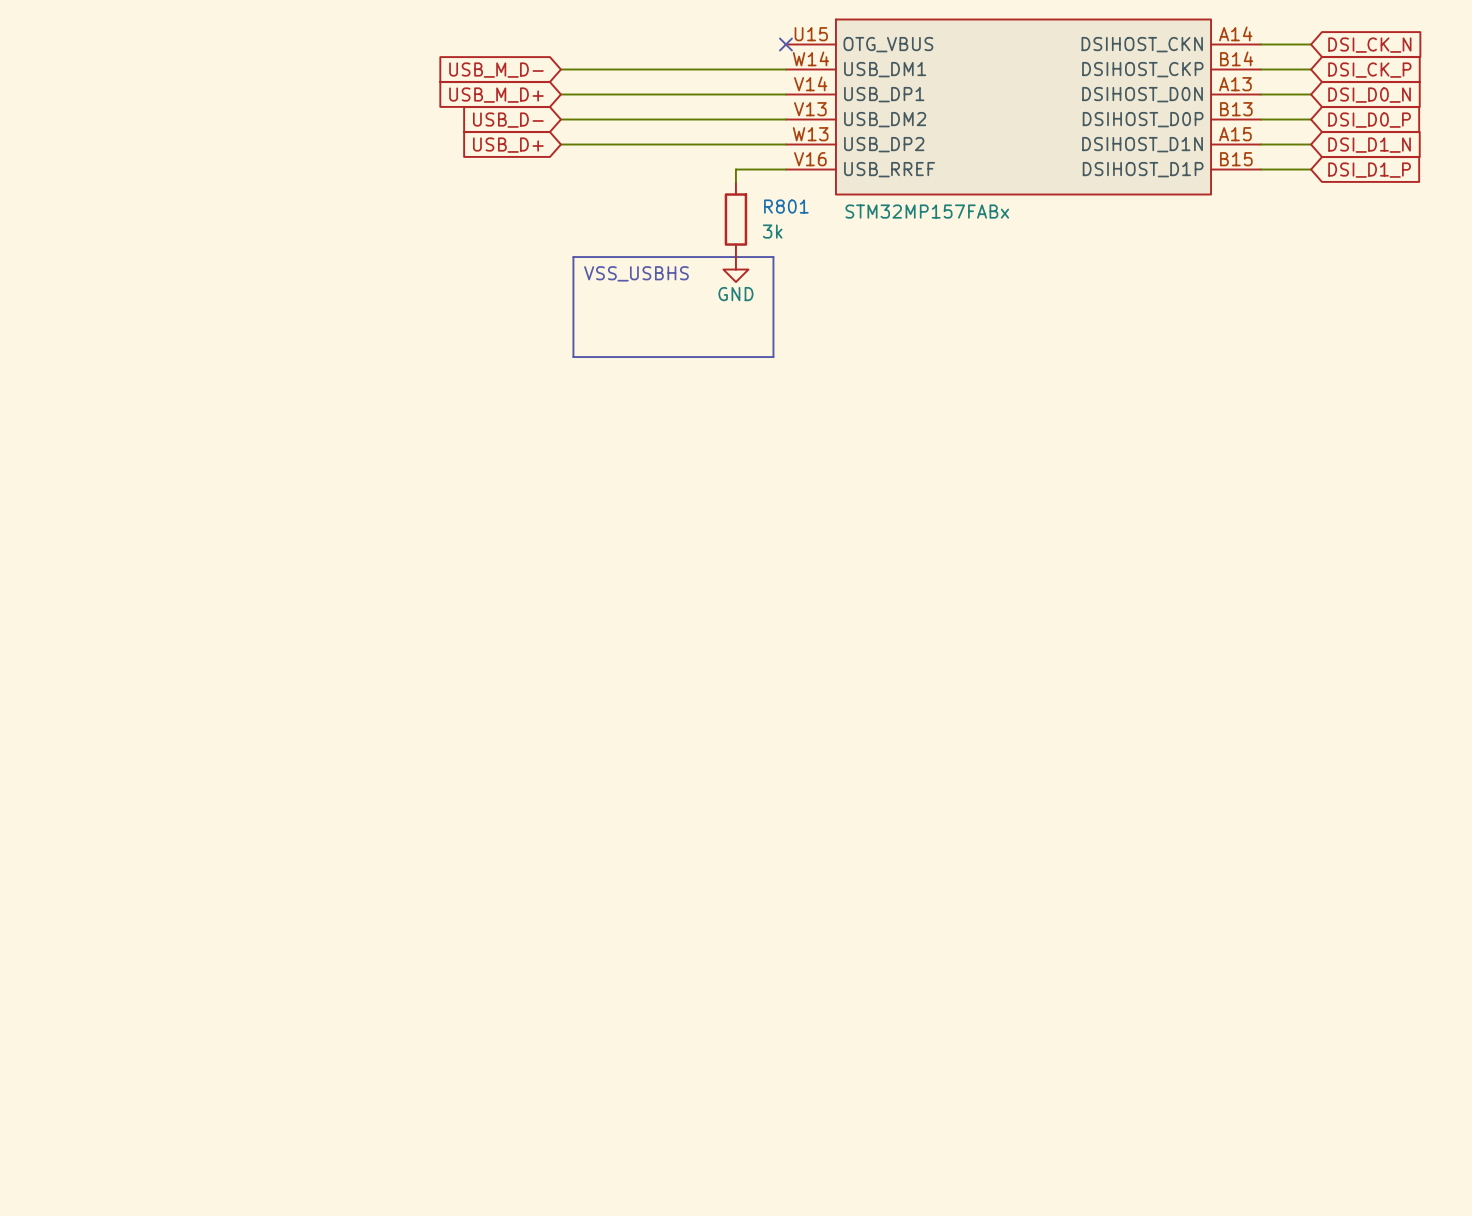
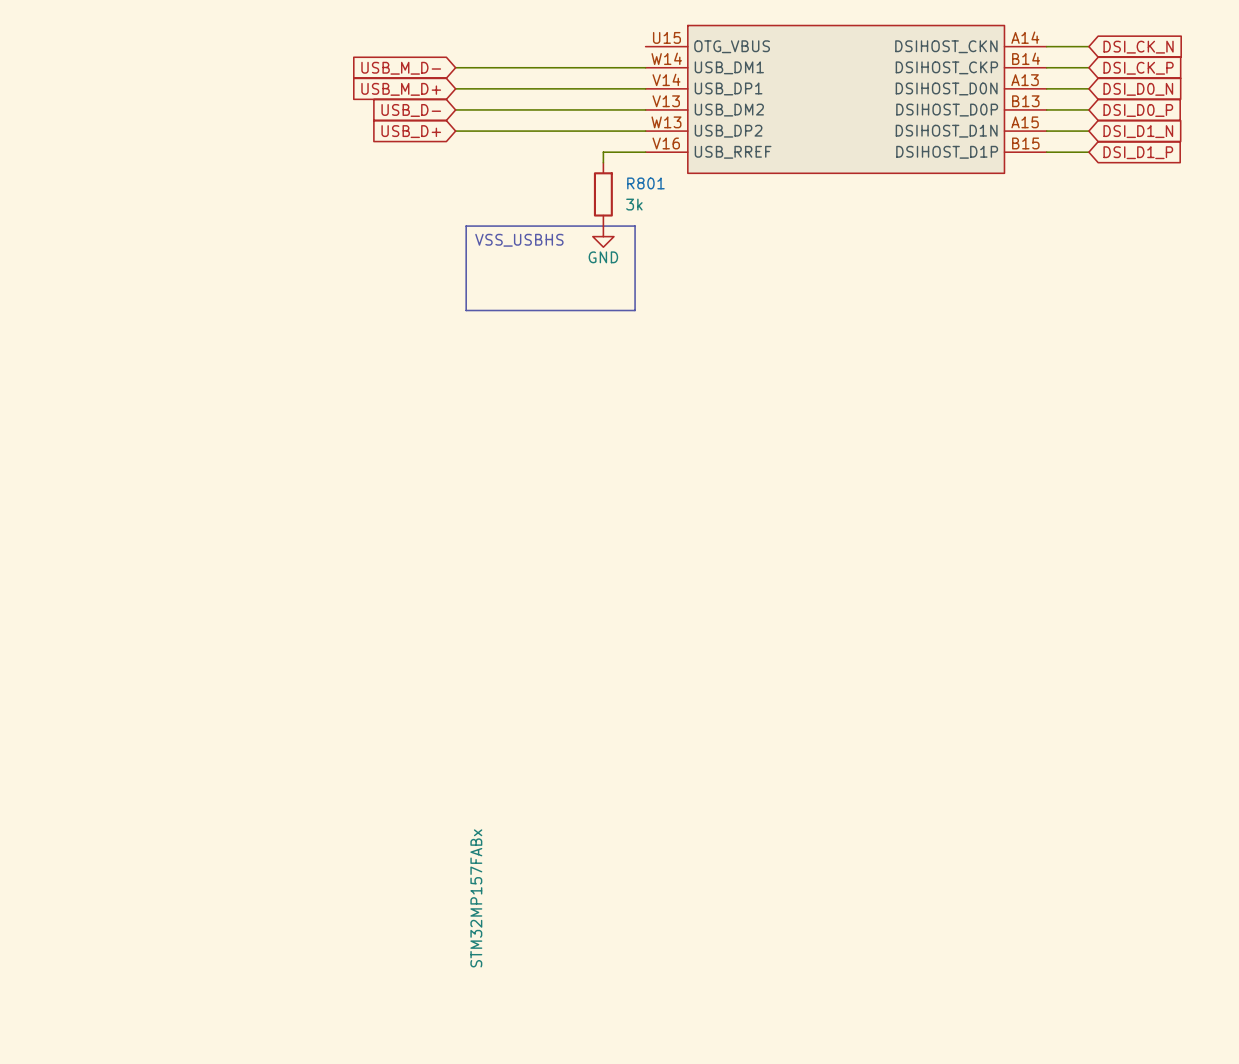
no-connect mark: (785, 44) -> none
part value rotation: 0° (927, 211) -> 90° counterclockwise (476, 898)
part value position: STM32MP157FABx (927, 211) -> STM32MP157FABx (476, 898)

